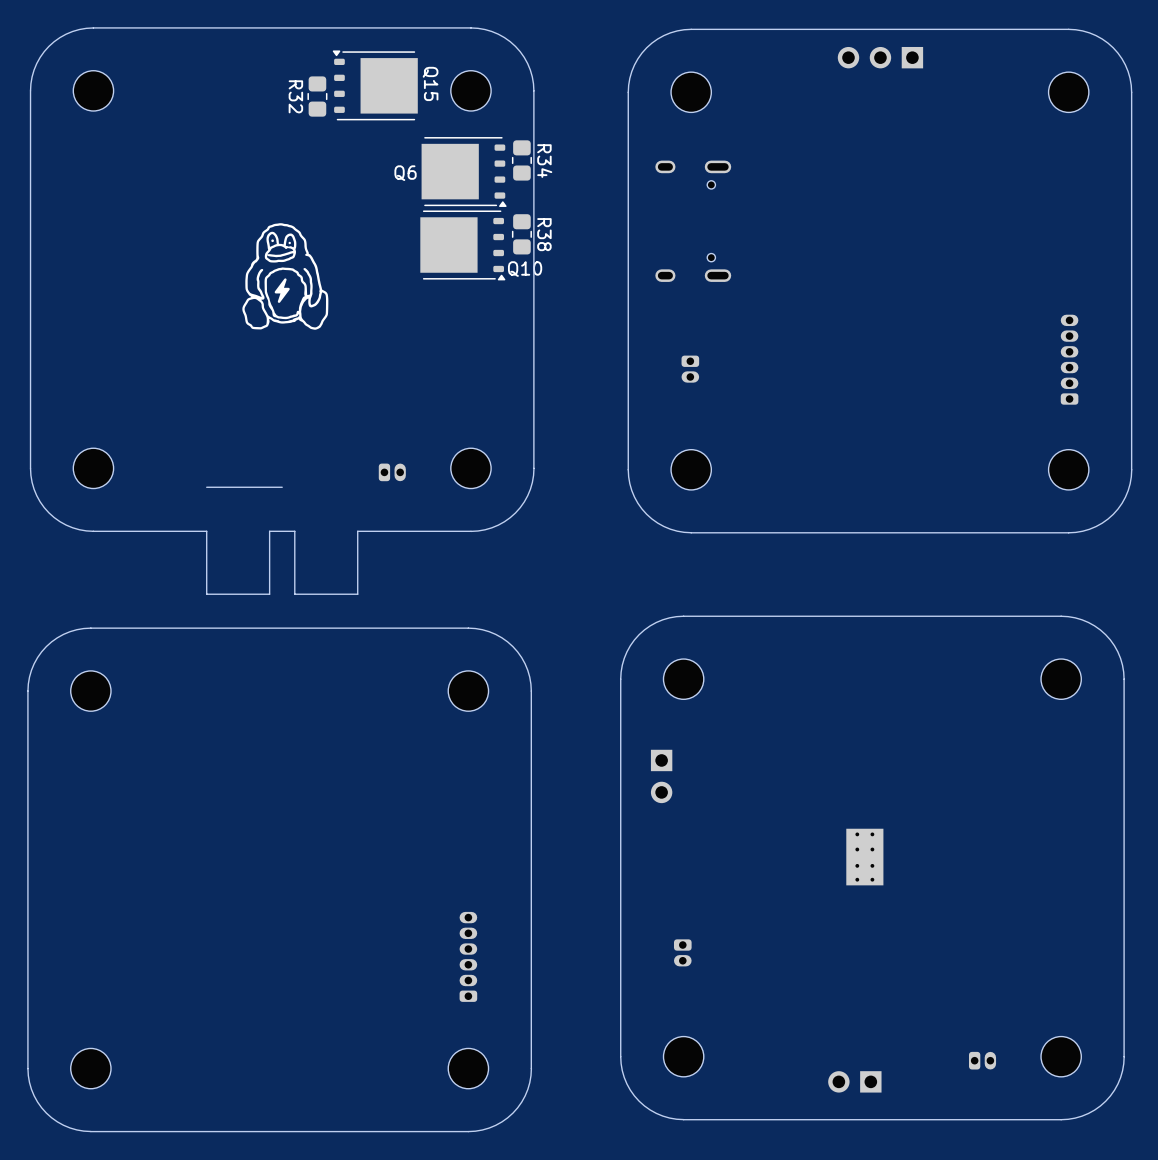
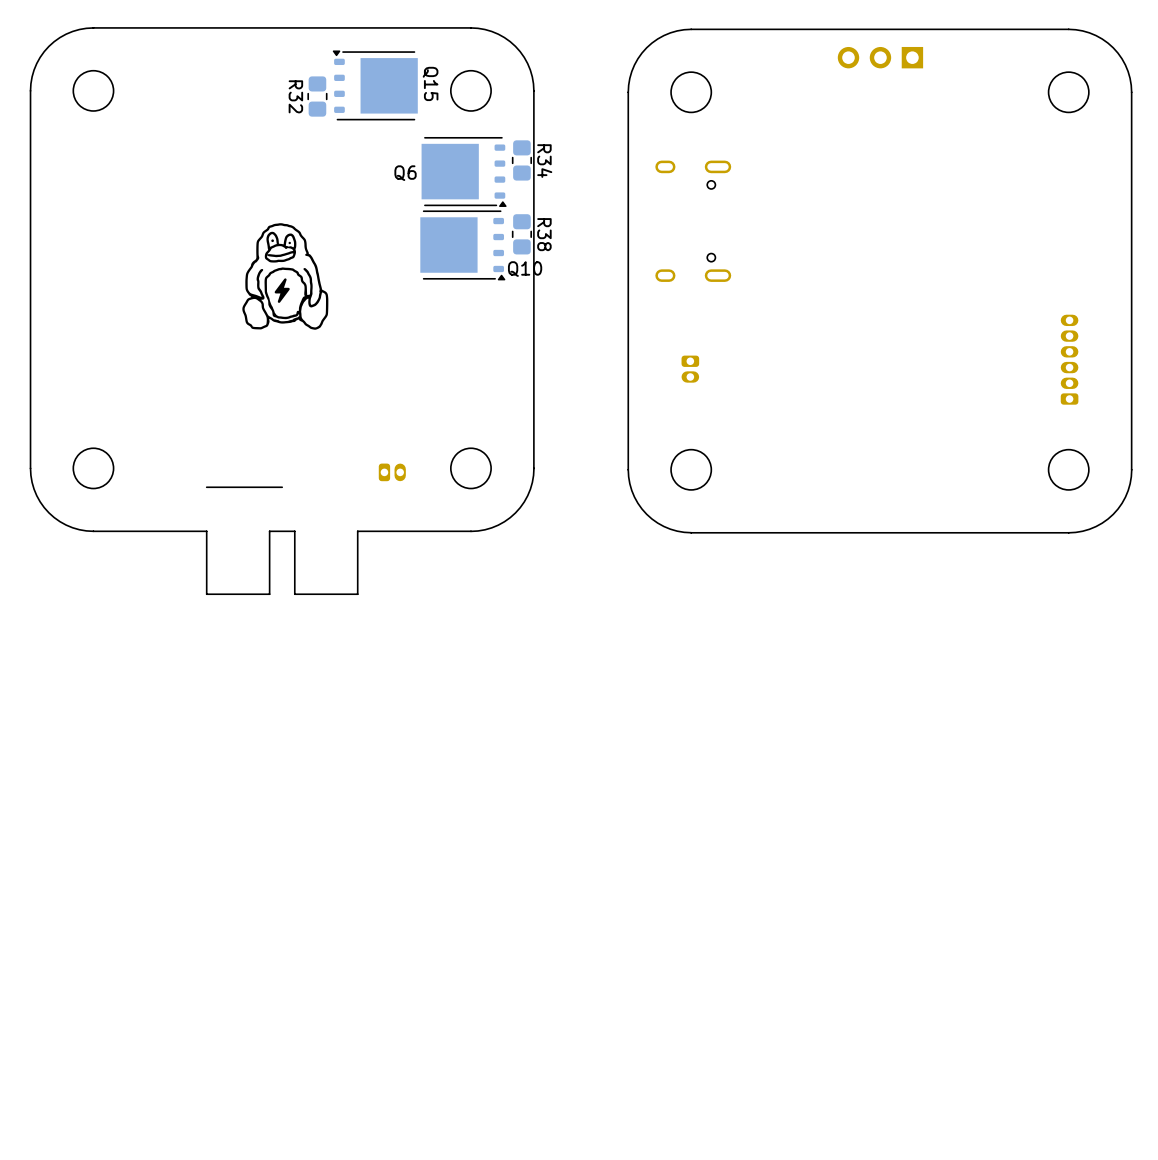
part: (683, 679) -> none
part: (1061, 679) -> none
part: (90, 691) -> none
part: (468, 691) -> none
part: (661, 776) -> none
part: (864, 857) -> none
part: (682, 952) -> none
part: (468, 956) -> none
part: (683, 1056) -> none
part: (1061, 1056) -> none
board edge: (1124, 1056) (1120, 1077) (1110, 1095) (1100, 1105) (1088, 1113) (1068, 1119) (683, 1119) -> none
board edge: (1124, 1056) (1124, 679) (1120, 658) (1114, 645) (1105, 634) (1094, 625) (1081, 619) (1061, 616) (676, 616) (656, 622) (639, 634) (626, 651) (621, 672) (620, 1056) (624, 1077) (630, 1090) (639, 1101) (650, 1109) (662, 1116) (683, 1119) -> none
part: (982, 1060) -> none
part: (90, 1068) -> none
part: (468, 1068) -> none
board edge: (531, 1068) (527, 1089) (517, 1107) (507, 1117) (495, 1125) (475, 1131) (90, 1131) -> none
board edge: (531, 1068) (531, 691) (527, 670) (521, 657) (512, 646) (495, 634) (482, 629) (468, 628) (83, 628) (63, 634) (46, 646) (34, 663) (28, 684) (27, 1068) (31, 1089) (37, 1102) (46, 1113) (57, 1121) (70, 1127) (90, 1131) -> none
part: (854, 1081) -> none

